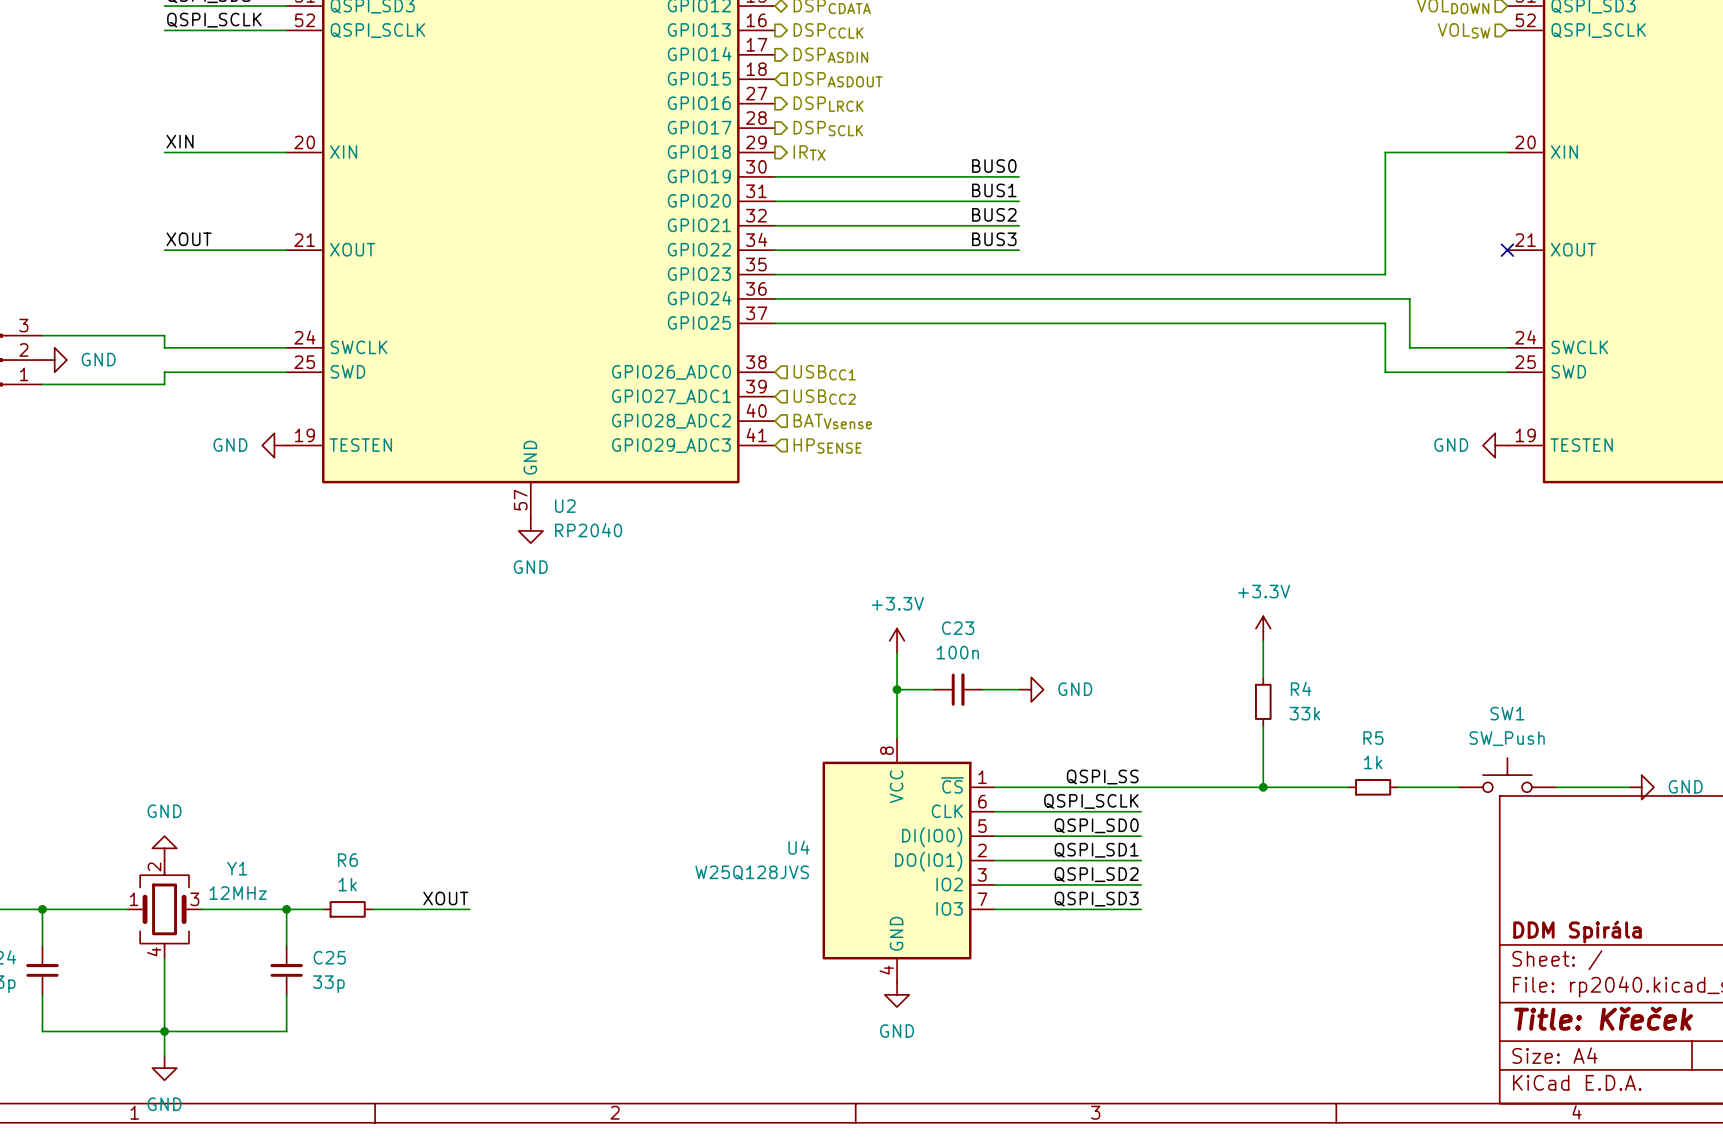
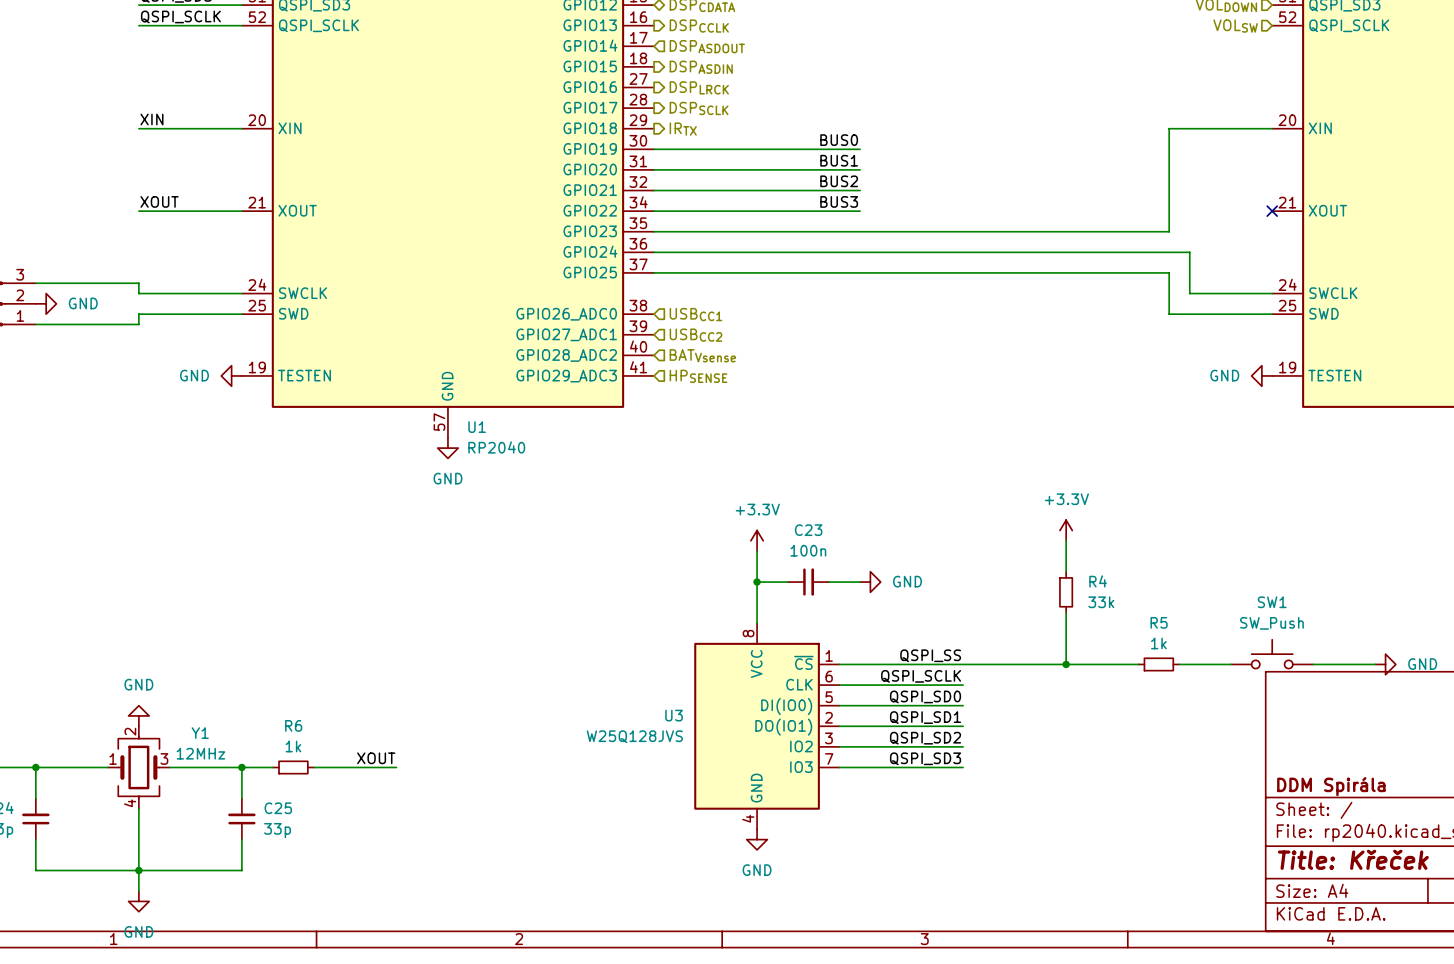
hierarchical label shape: output (830, 55) -> input (707, 46)
hierarchical label: DSPASDIN (830, 55) -> DSPASDOUT (707, 46)
hierarchical label shape: input (838, 79) -> output (701, 67)
hierarchical label: DSPASDOUT (838, 79) -> DSPASDIN (701, 67)
U2 name: U2 (565, 506) -> U1 (477, 427)
U4 name: U4 (798, 847) -> U3 (674, 715)

